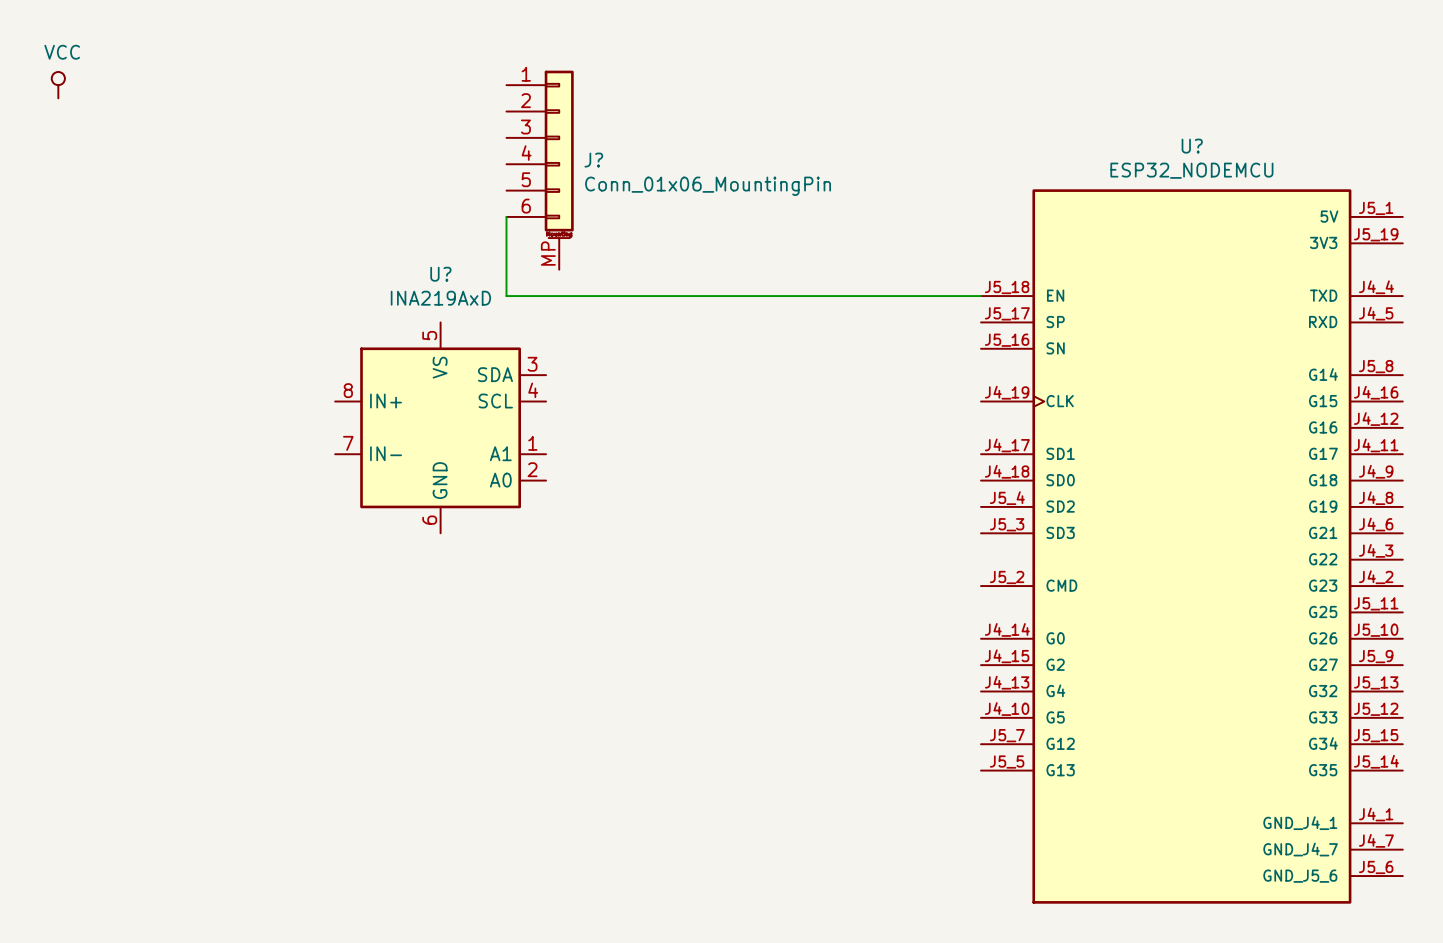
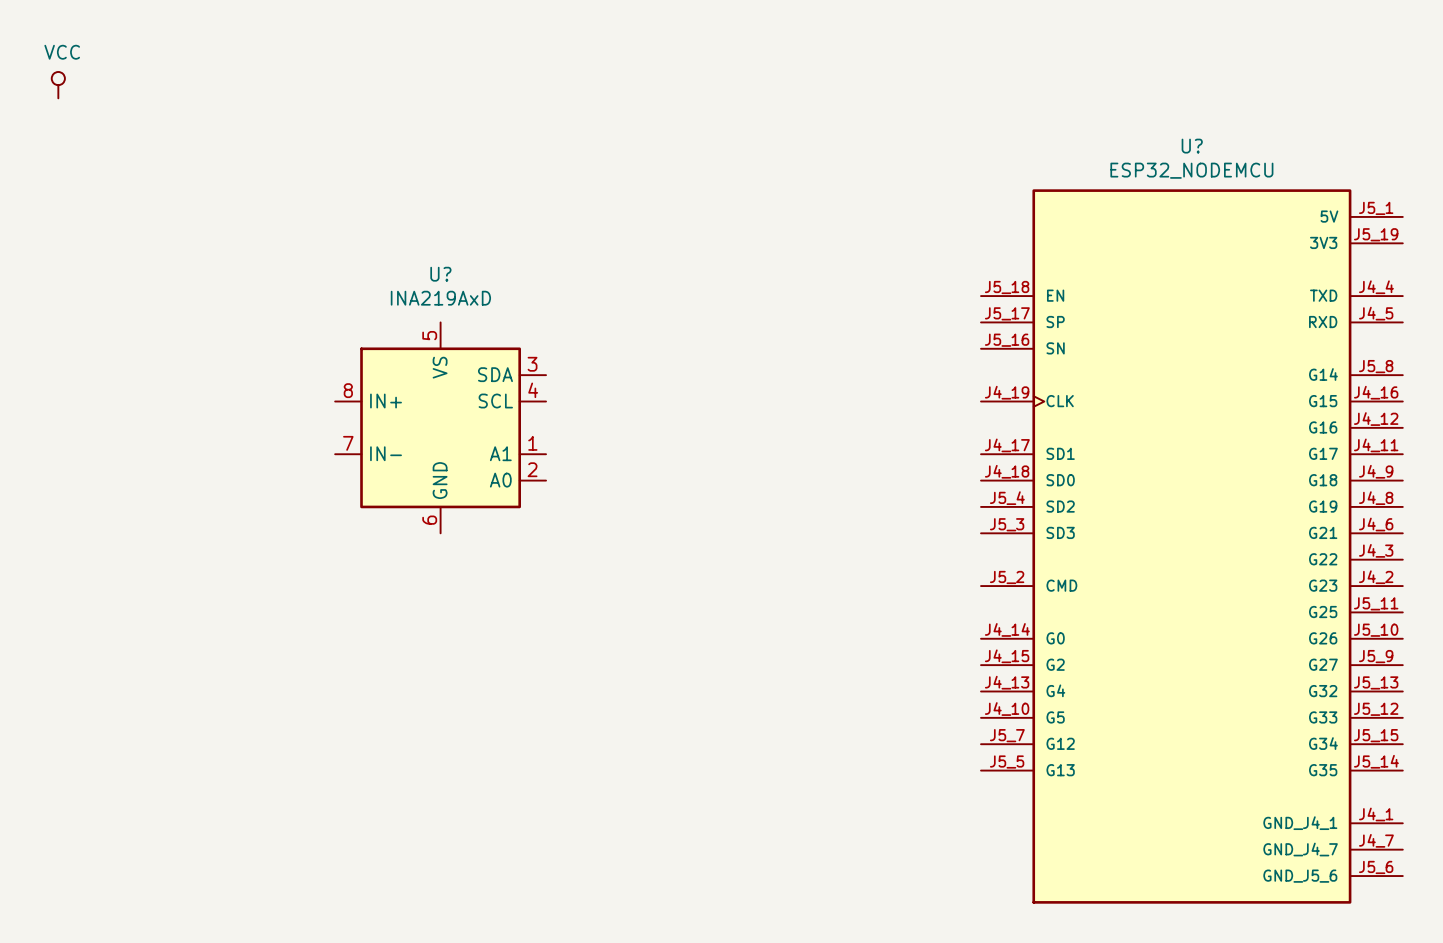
J?: Conn_01x06_MountingPin (540, 170) -> none
wire: (506, 216) (506, 296) (981, 296) -> none

